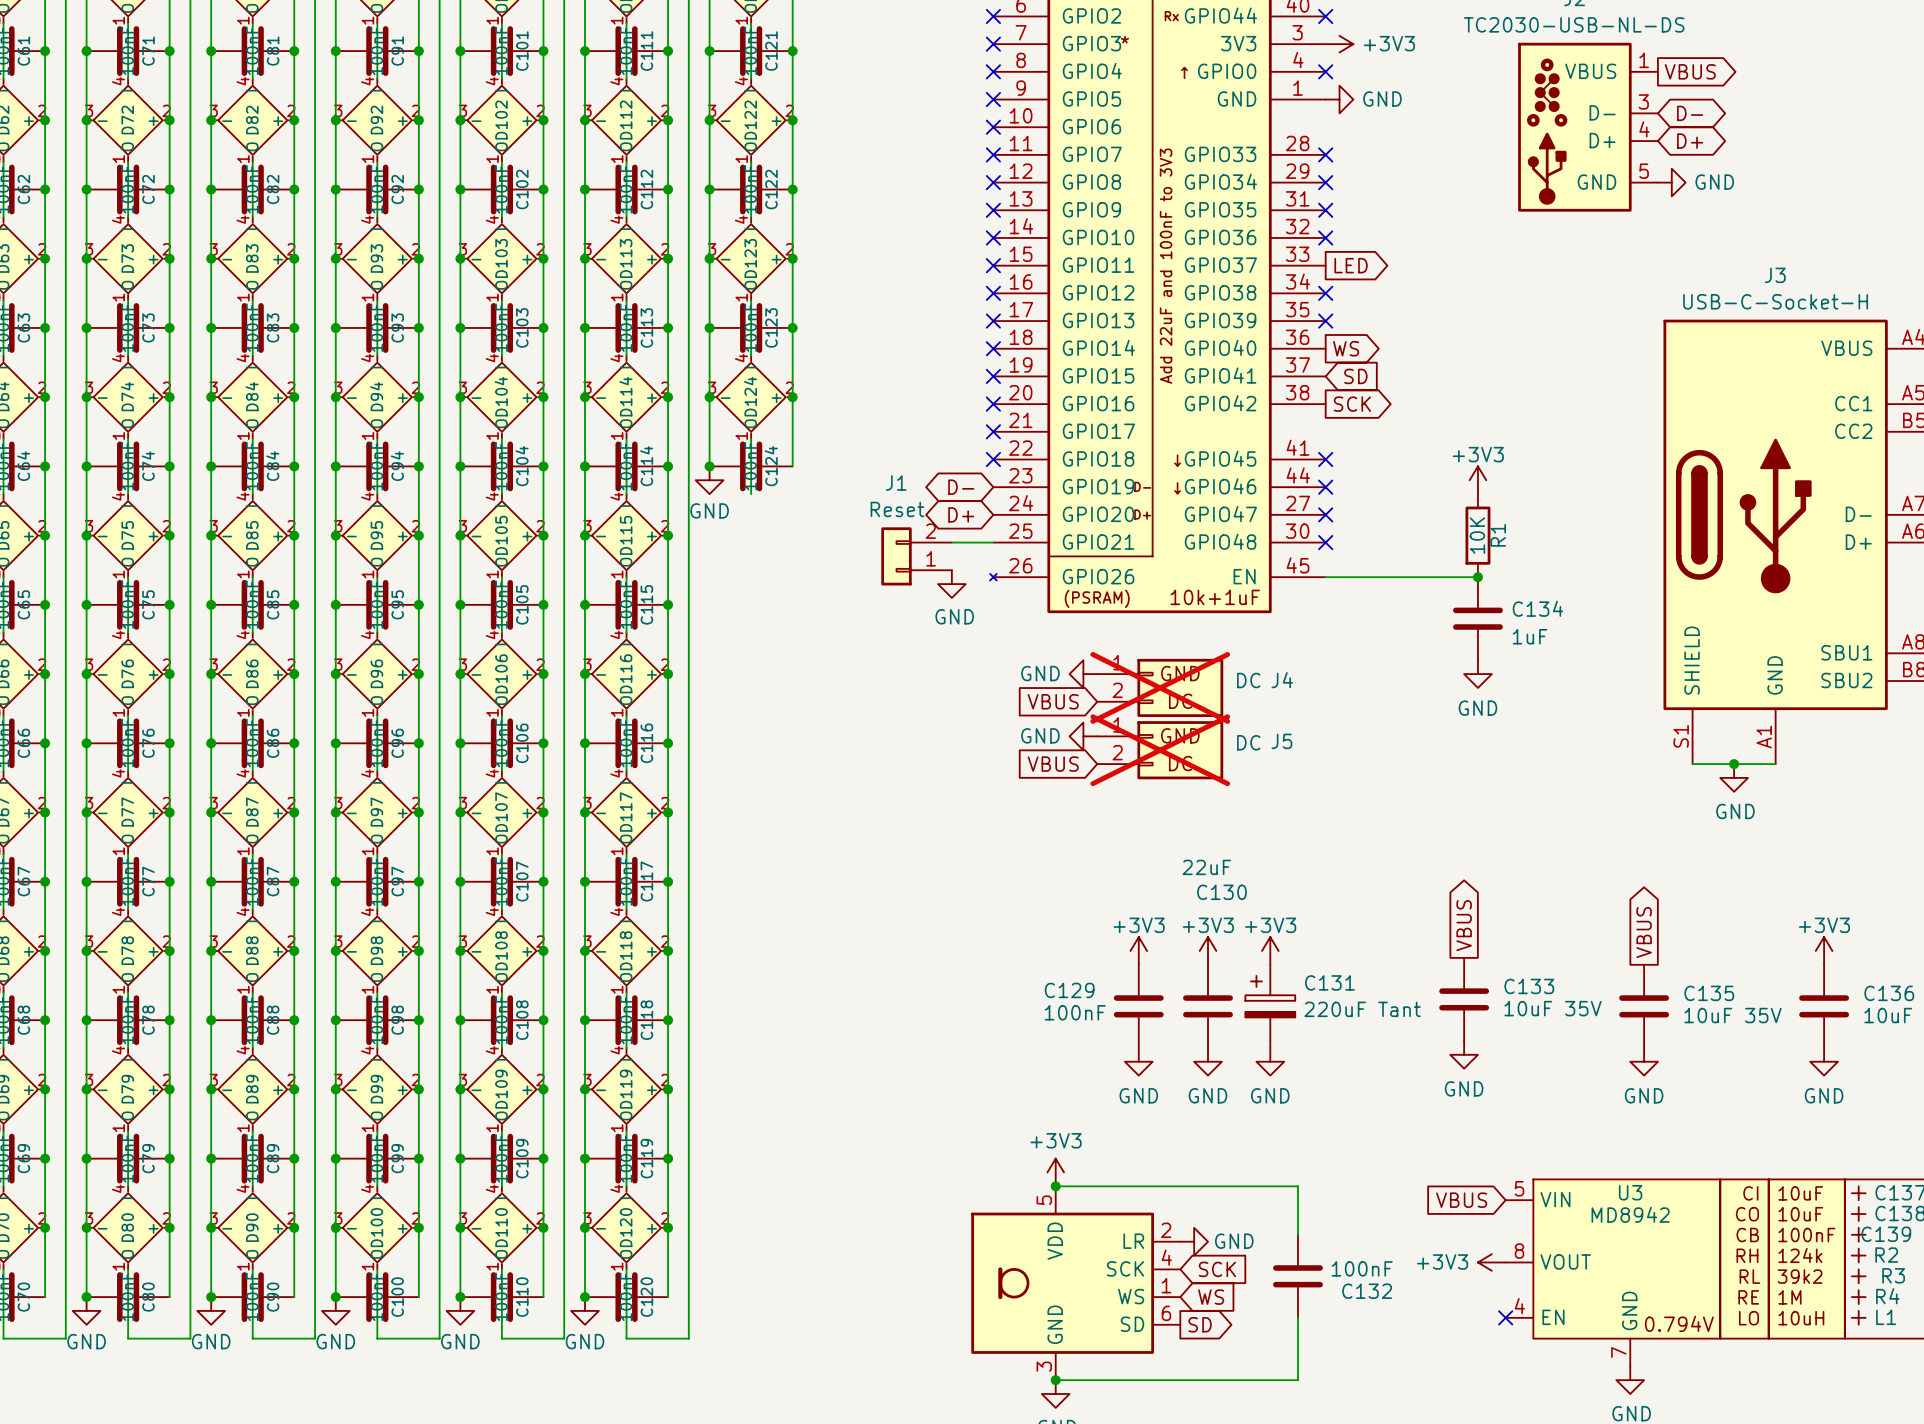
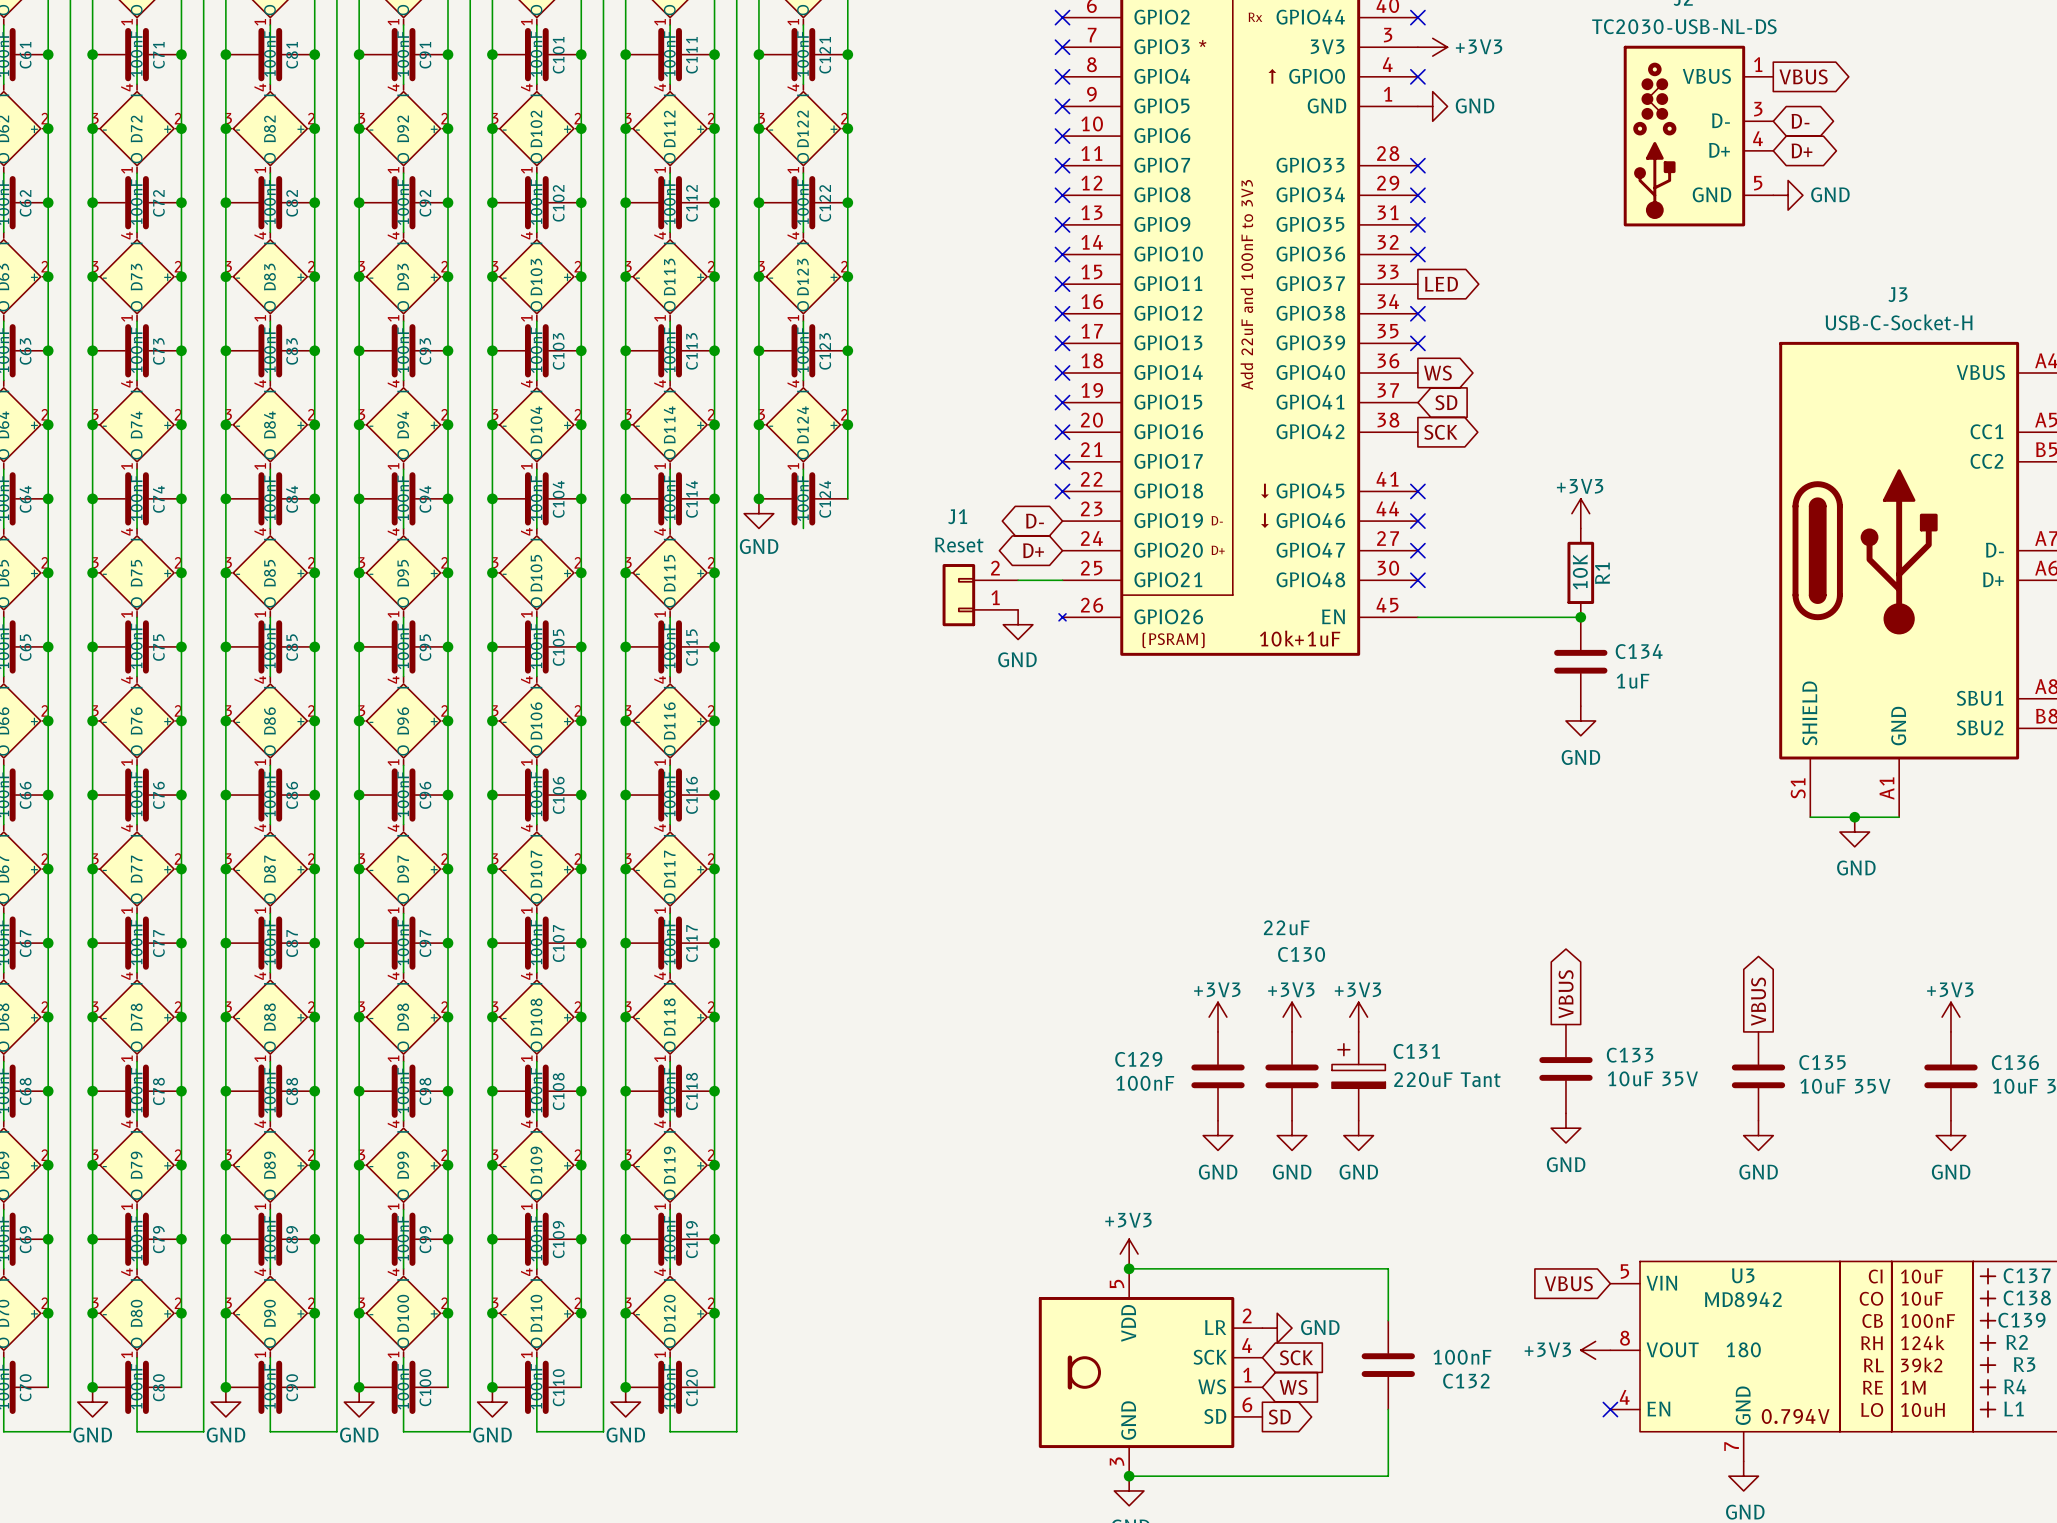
power symbol: GND (1083, 674) -> none
J4: DC (1160, 687) -> none
global label: VBUS (1053, 701) -> none
power symbol: GND (1083, 736) -> none
J5: DC (1160, 750) -> none
global label: VBUS (1053, 764) -> none
U3 text: none -> 180 (1743, 1349)

